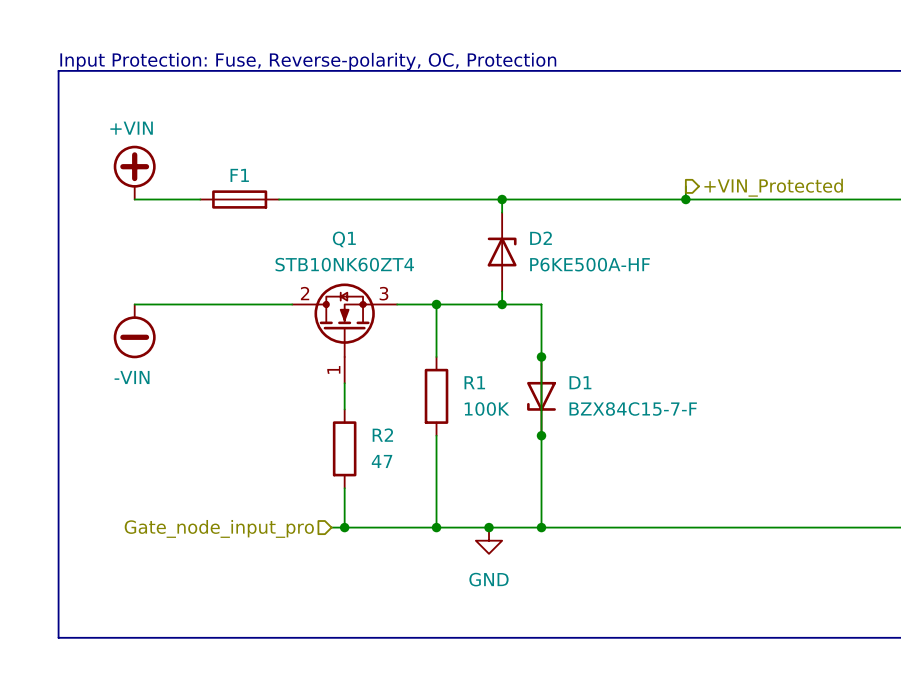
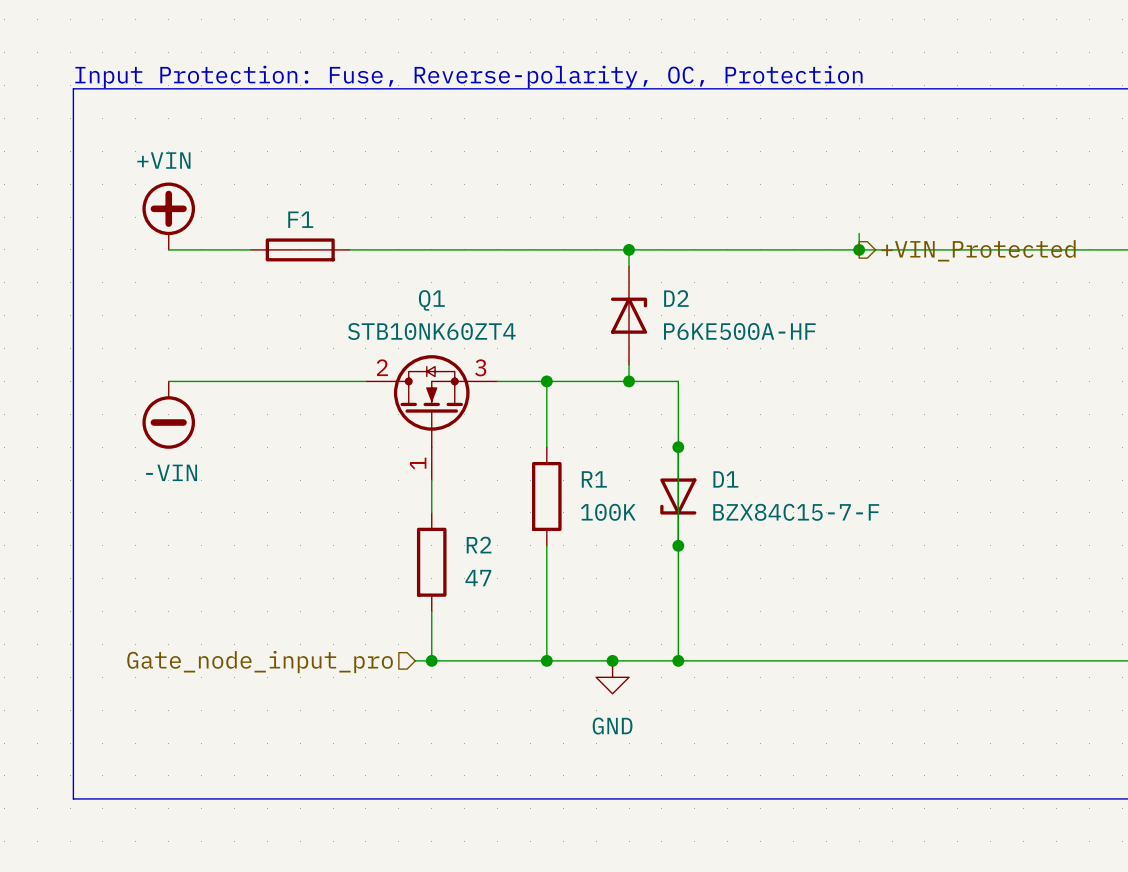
hierarchical label position: +VIN_Protected (773, 187) -> +VIN_Protected (978, 250)

